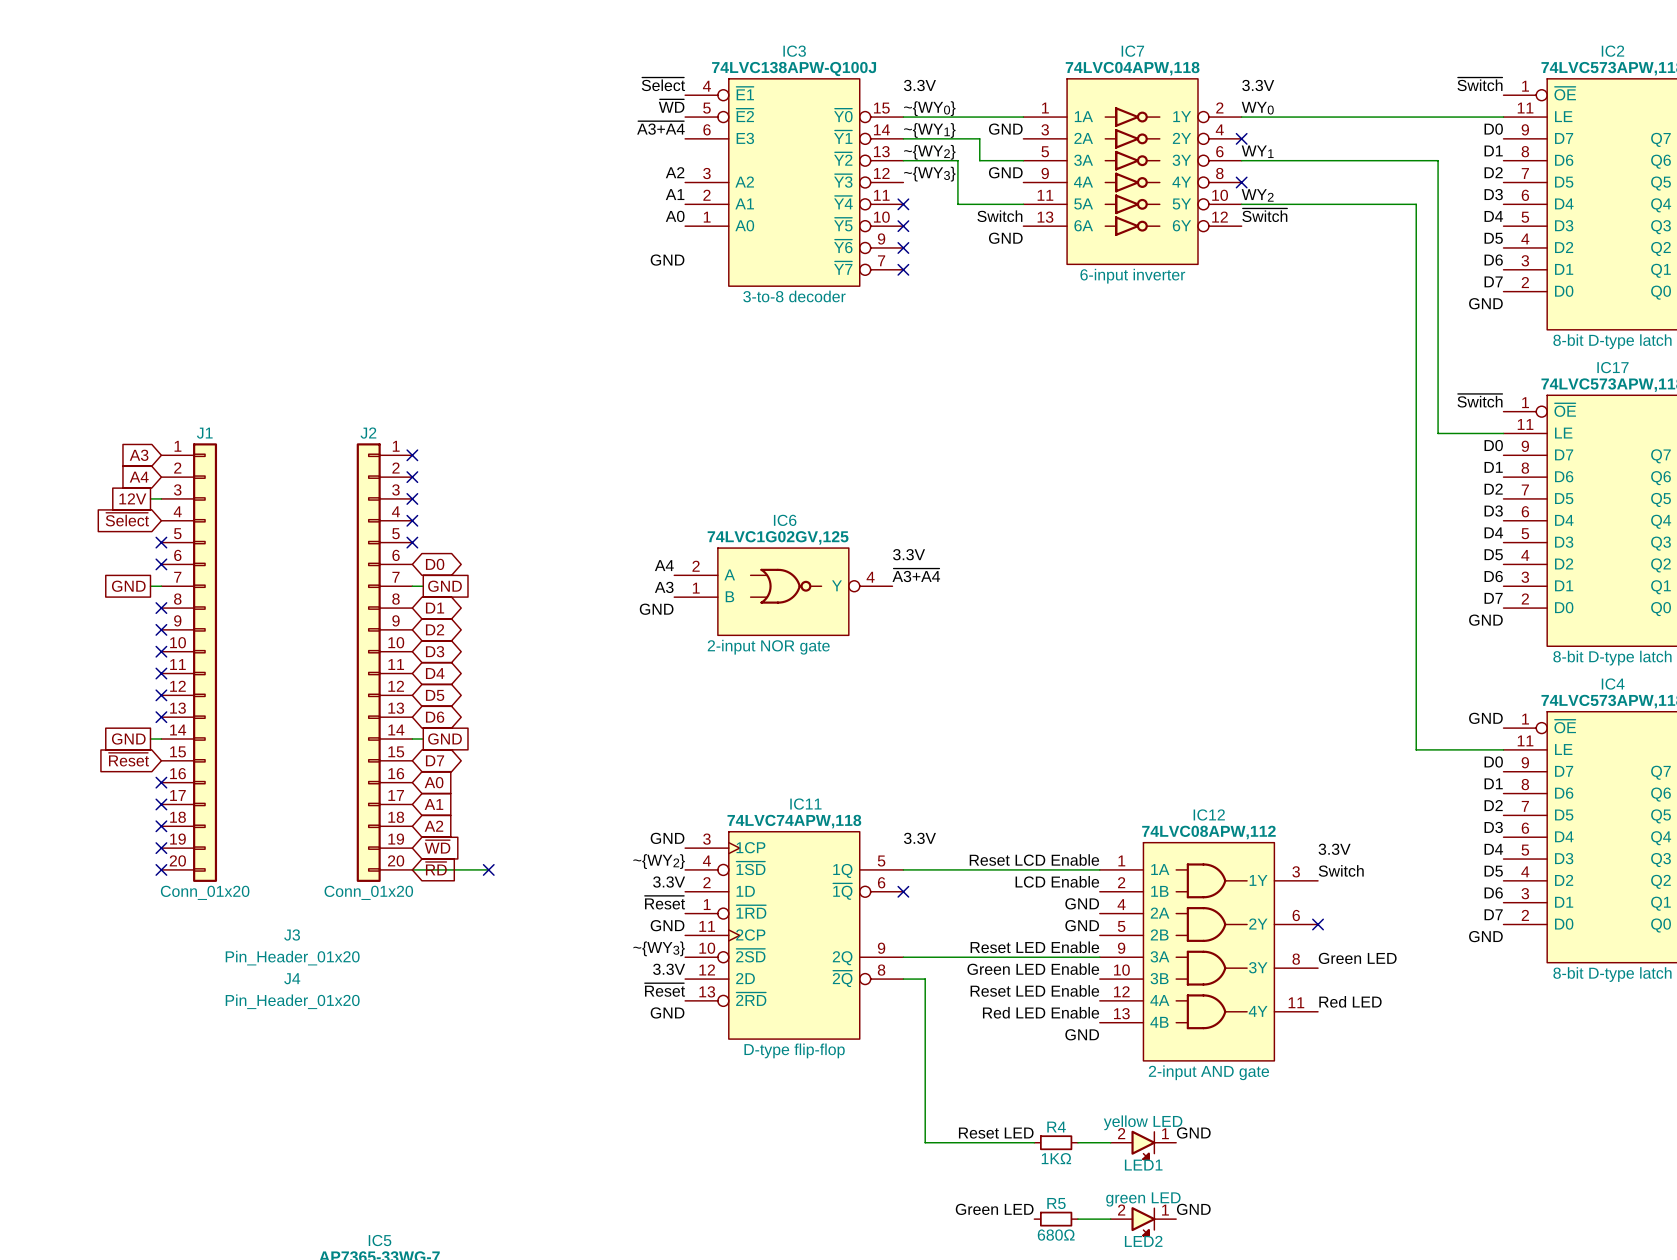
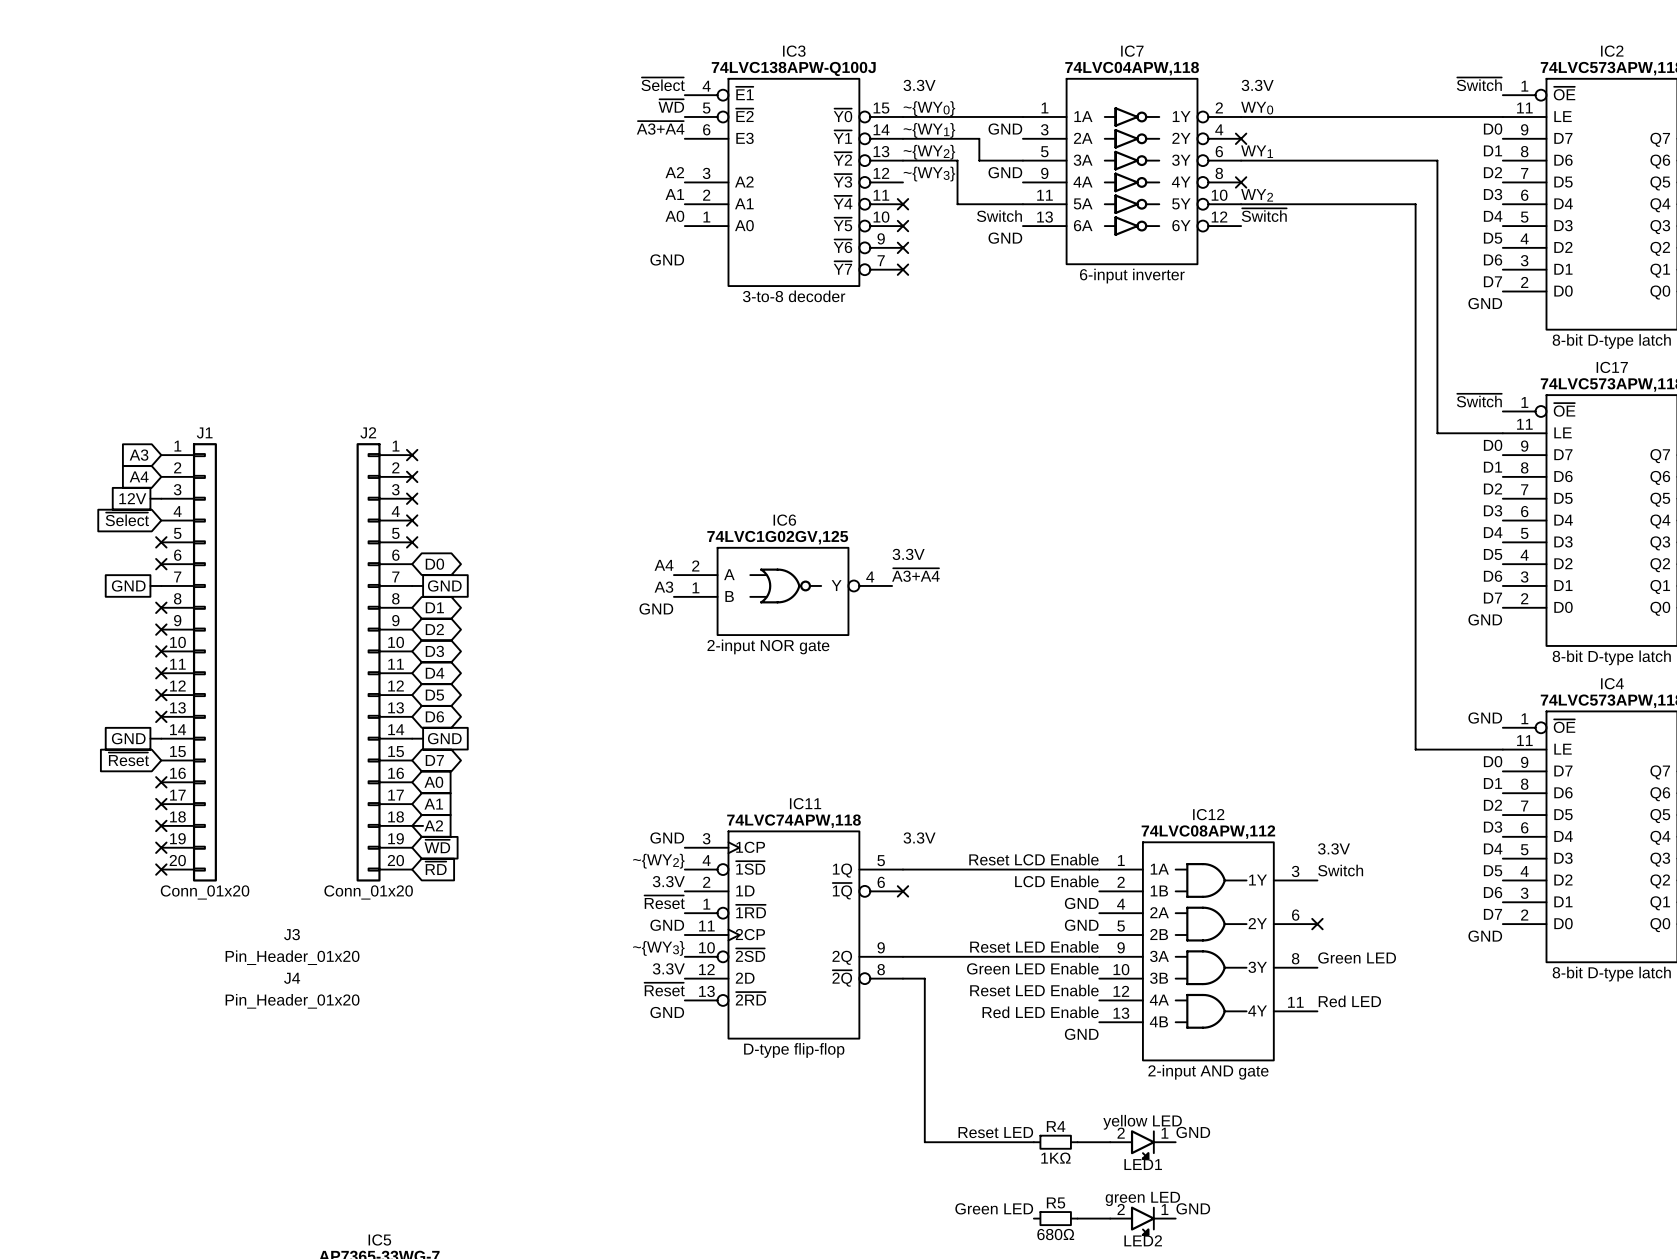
wire: none -> (412, 825) (423, 825)
wire: (412, 869) (488, 869) -> none
no-connect mark: (488, 869) -> none

